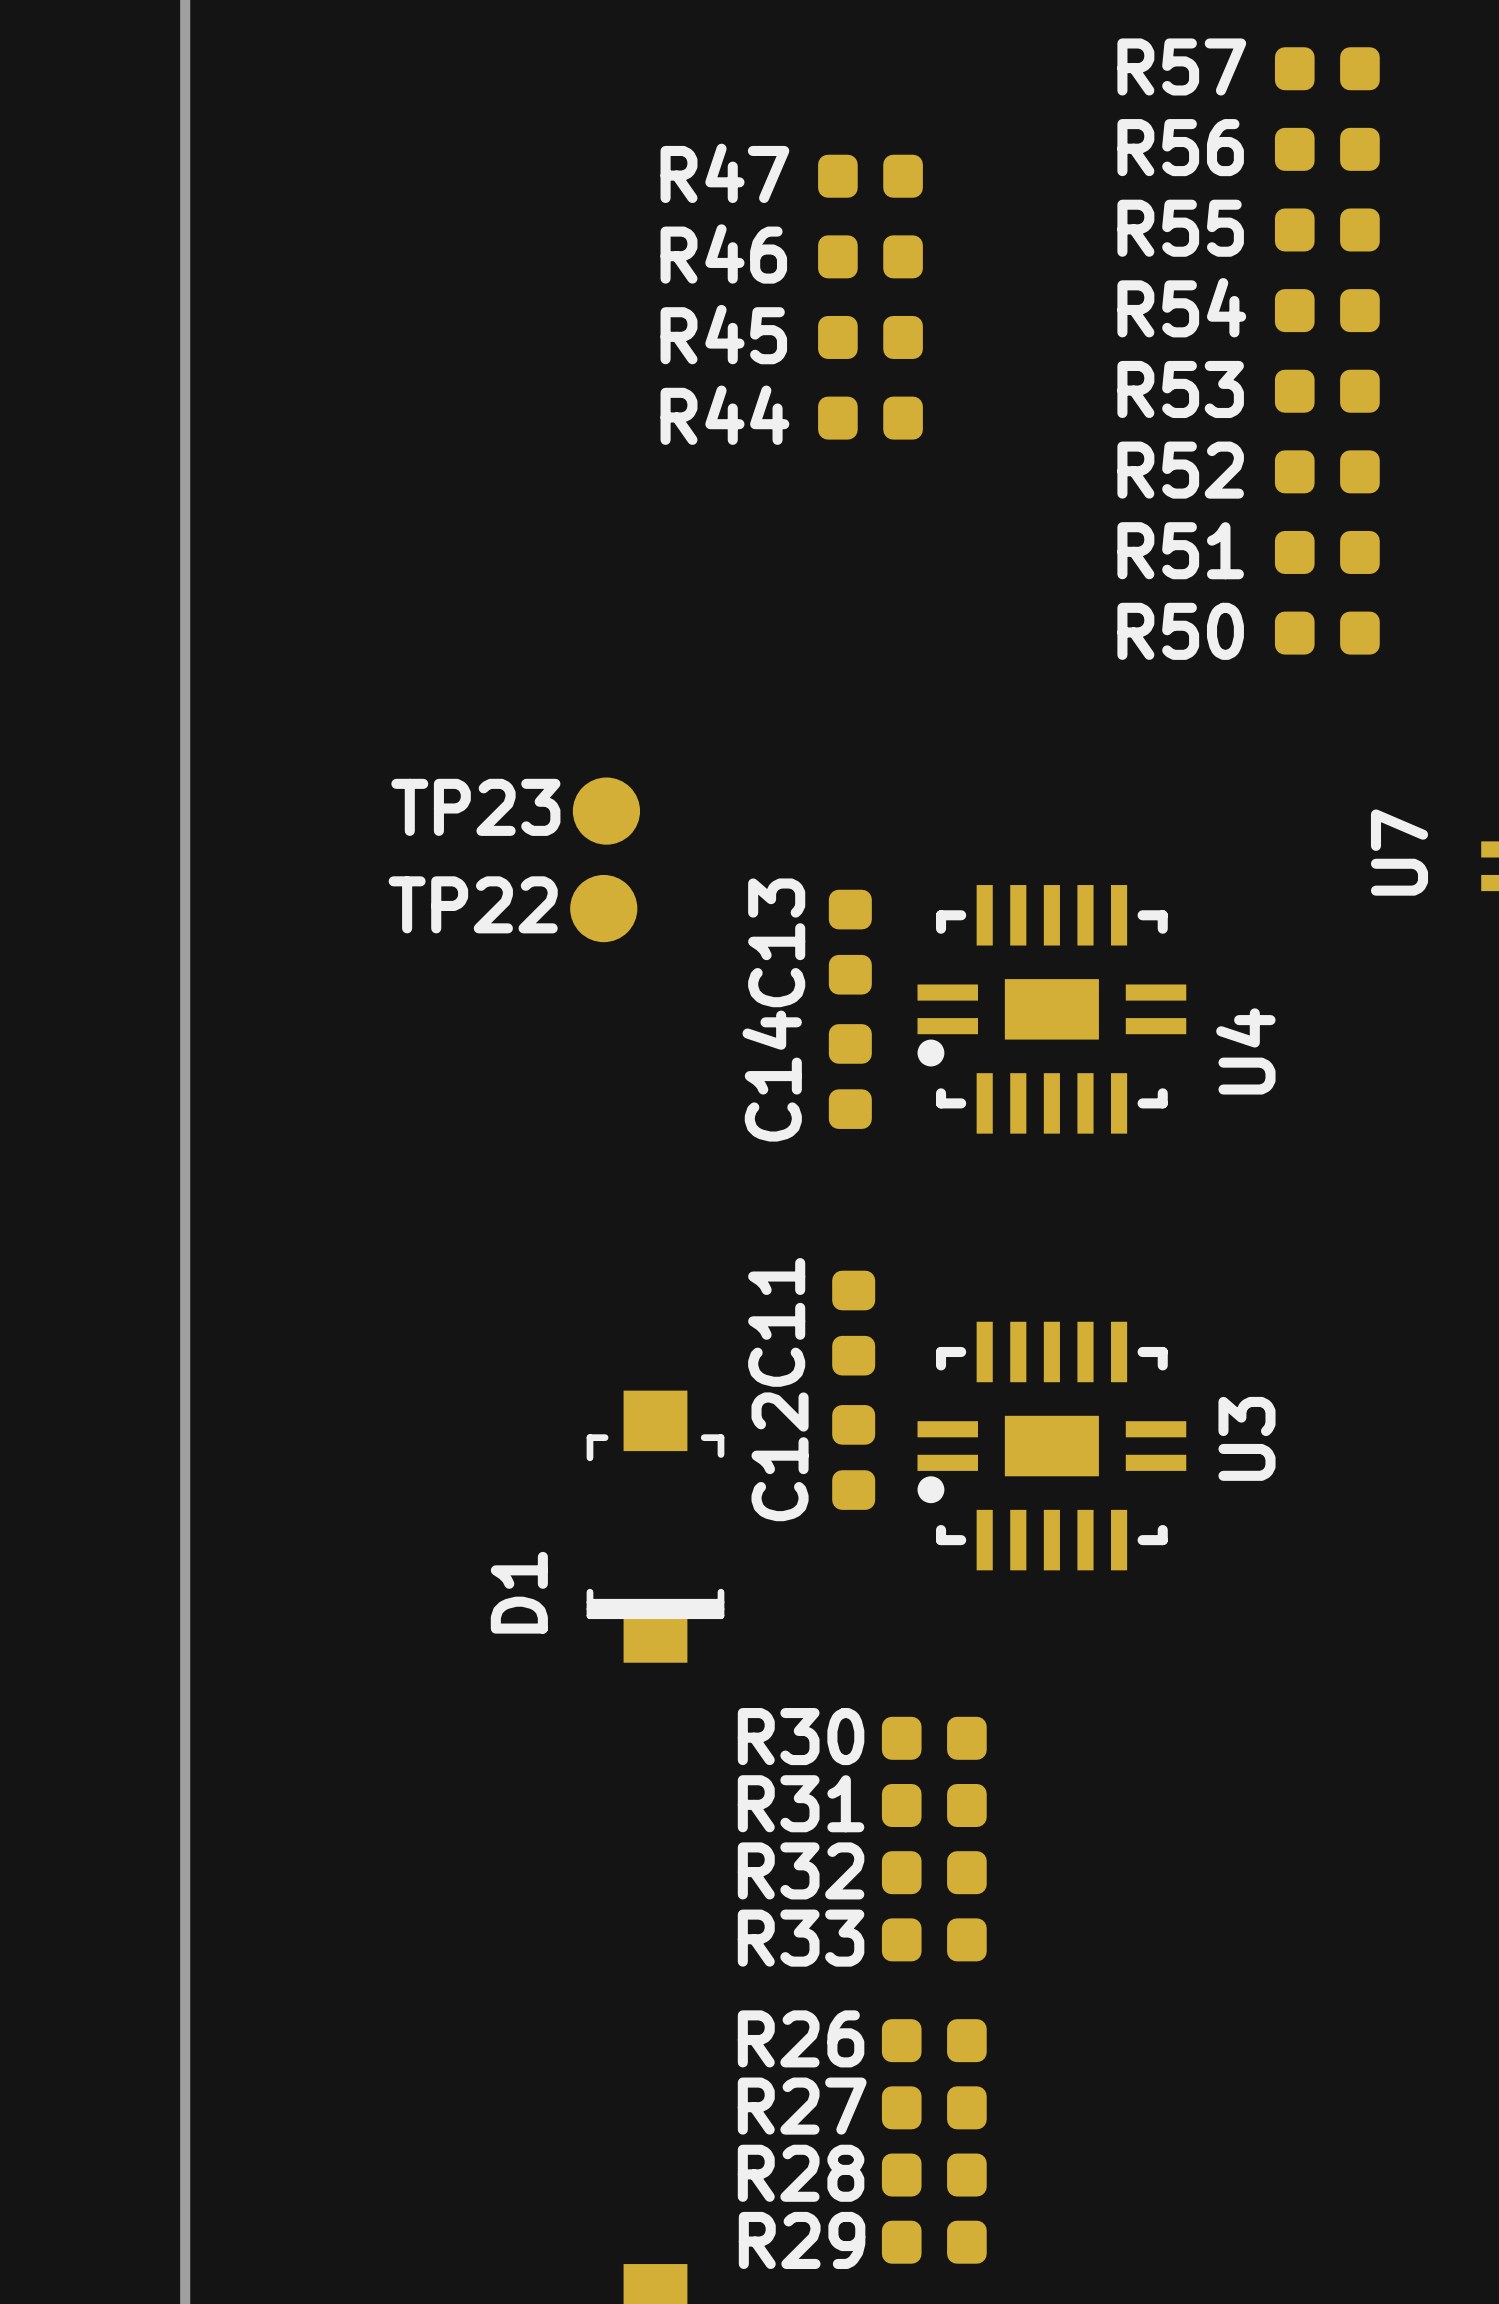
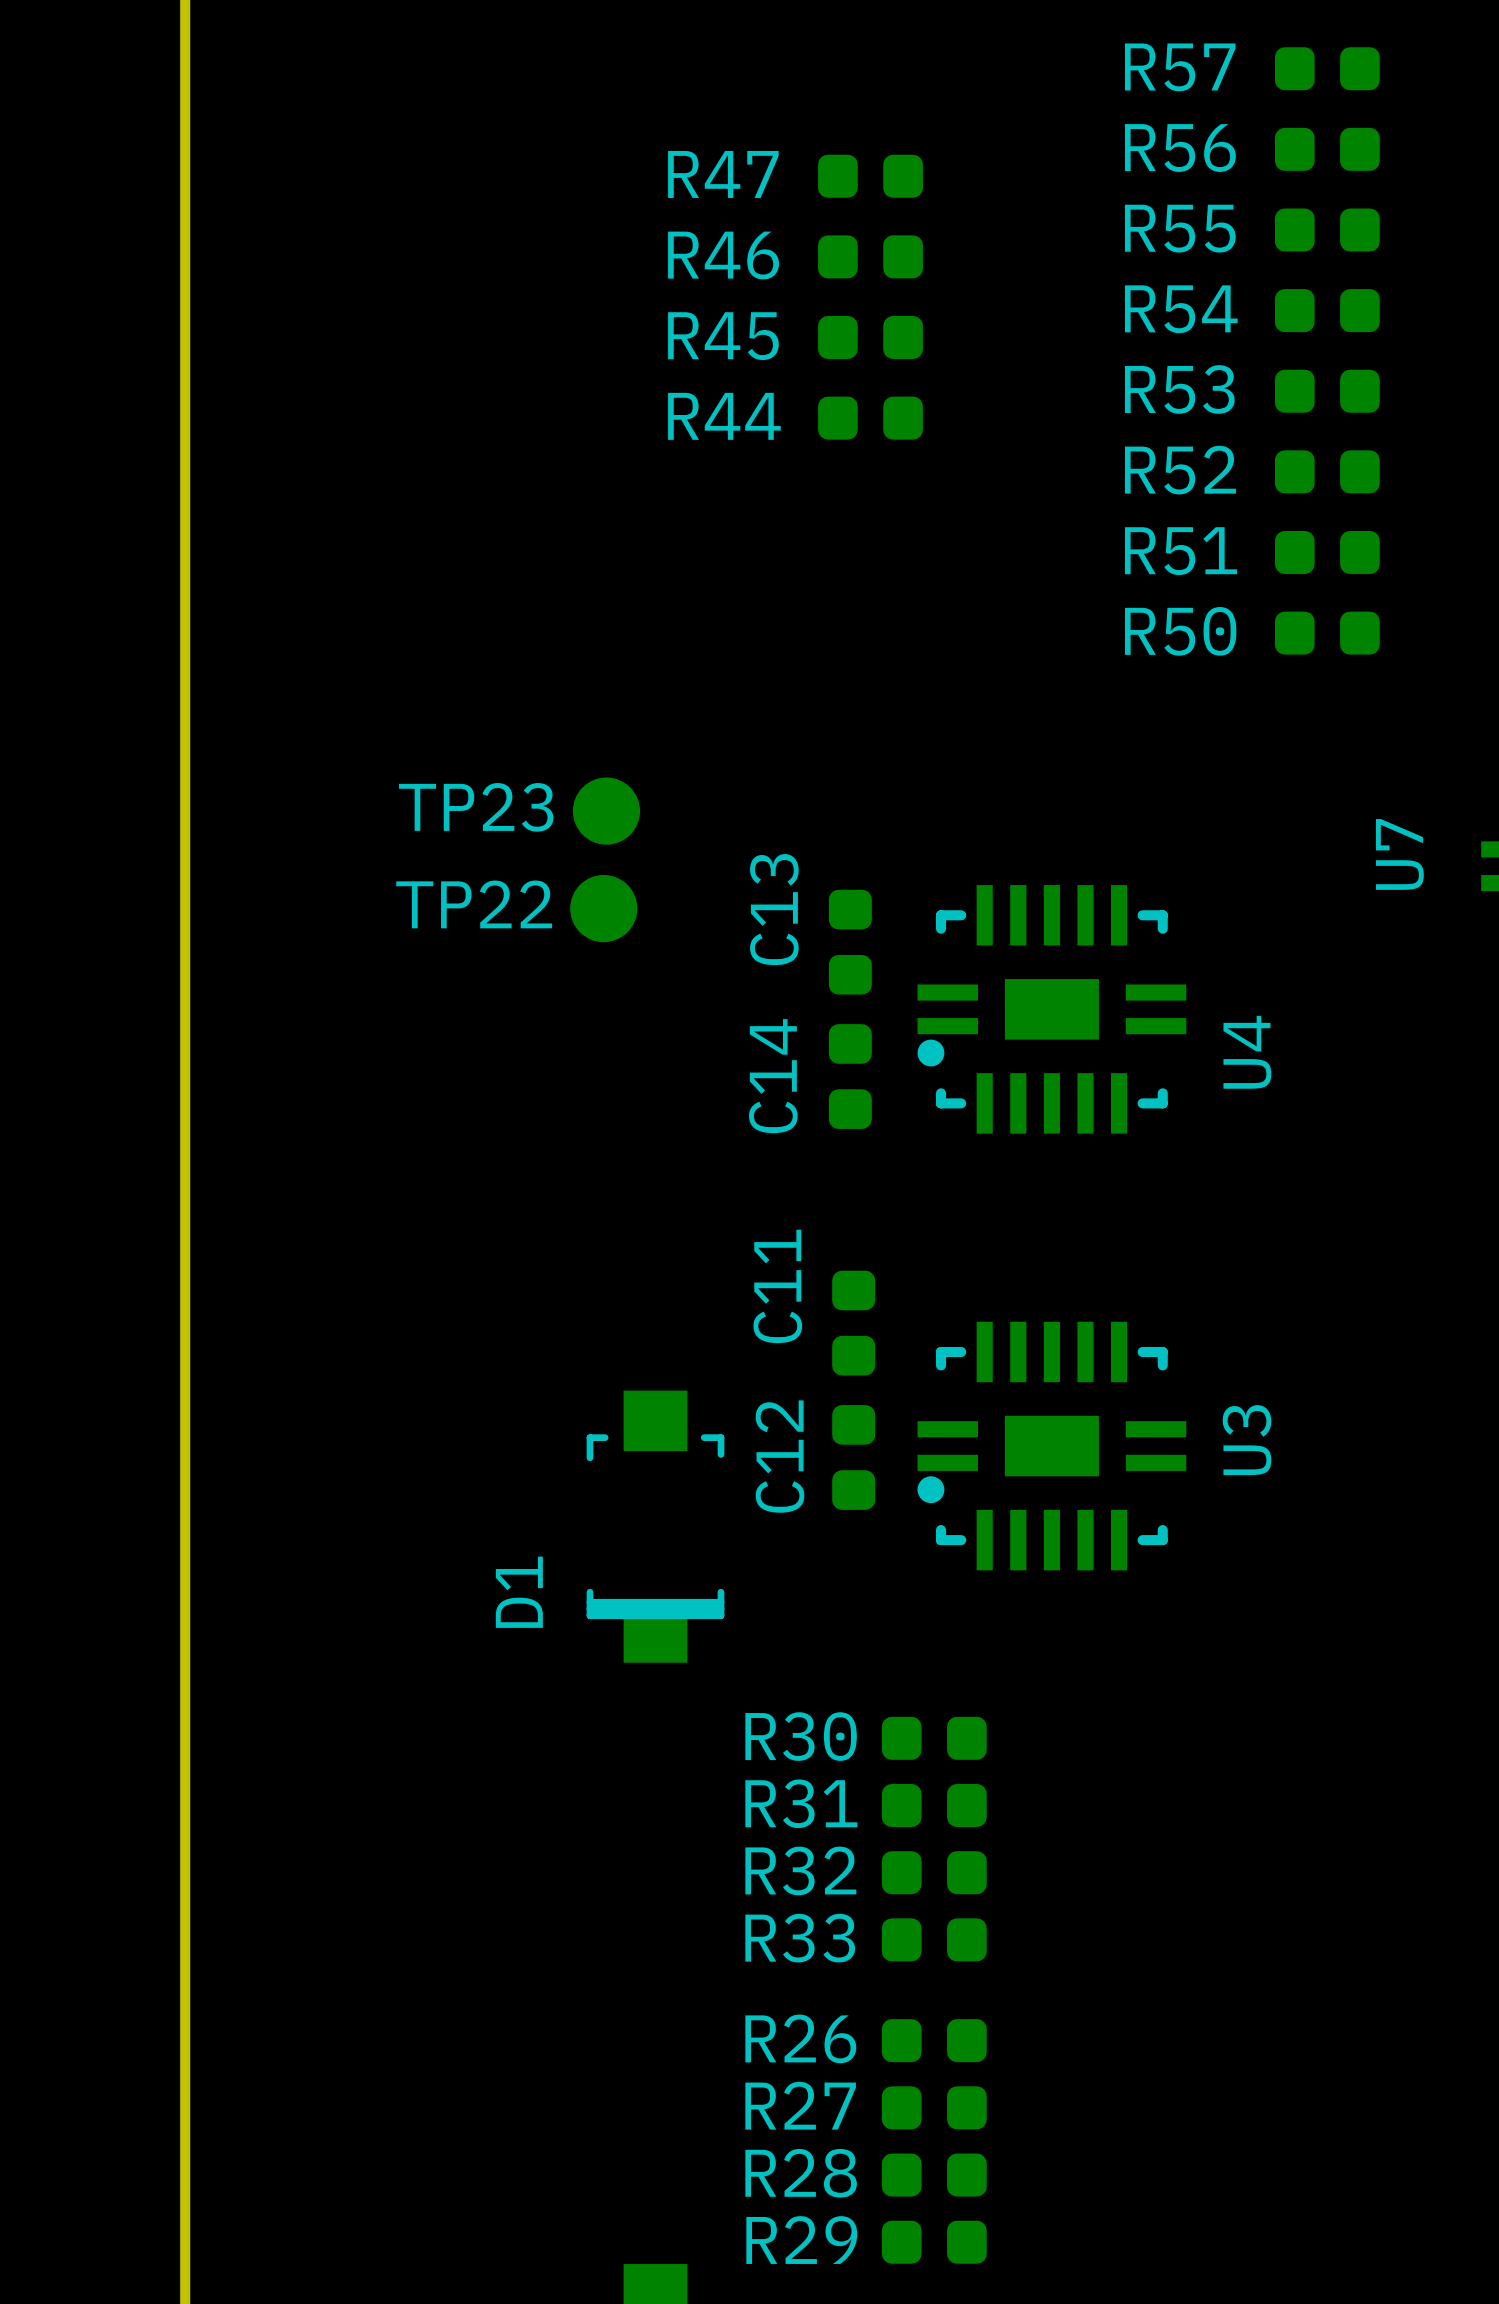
C13 name position: C13 (776, 942) -> C13 (774, 909)
C11 name position: C11 (776, 1322) -> C11 (777, 1286)

